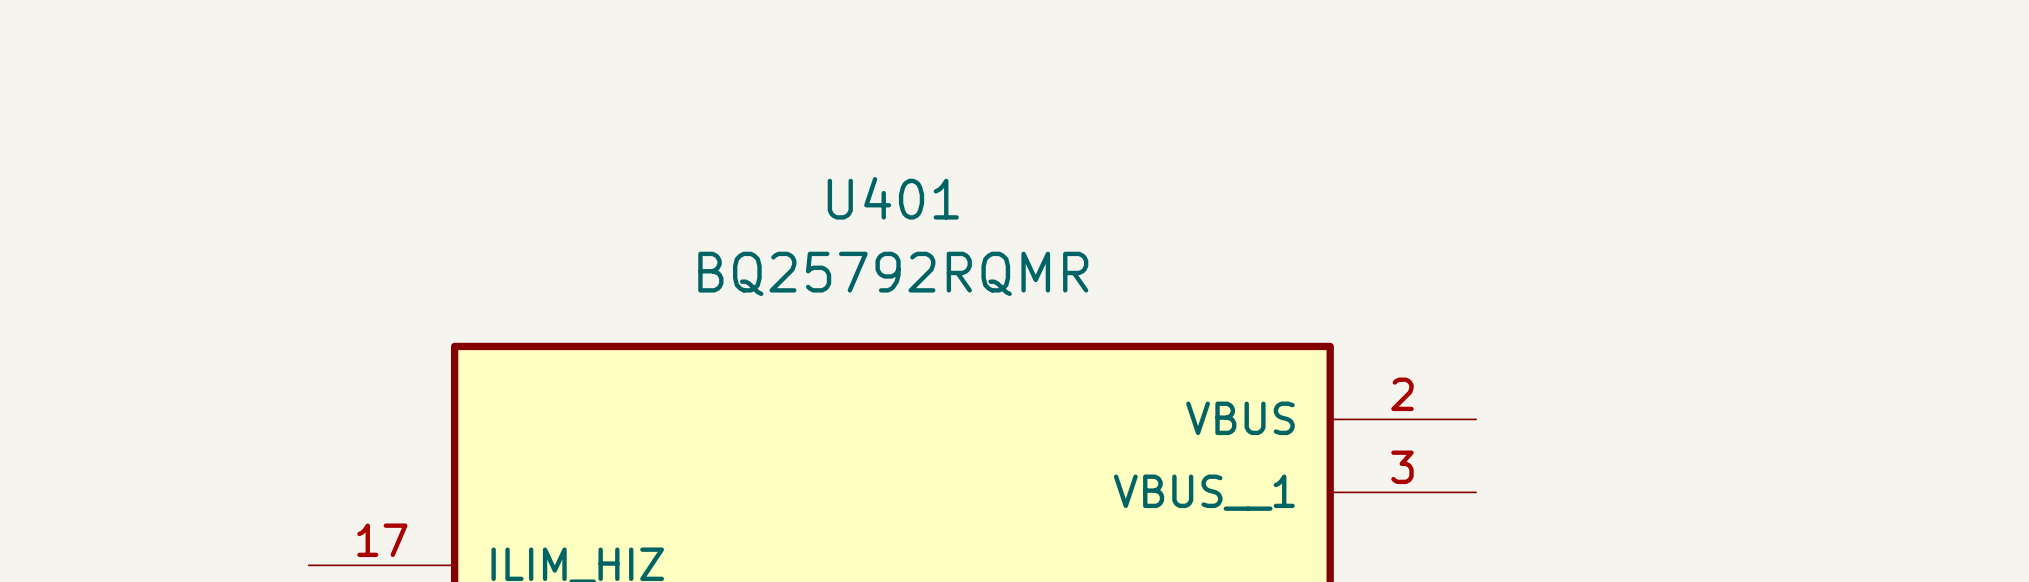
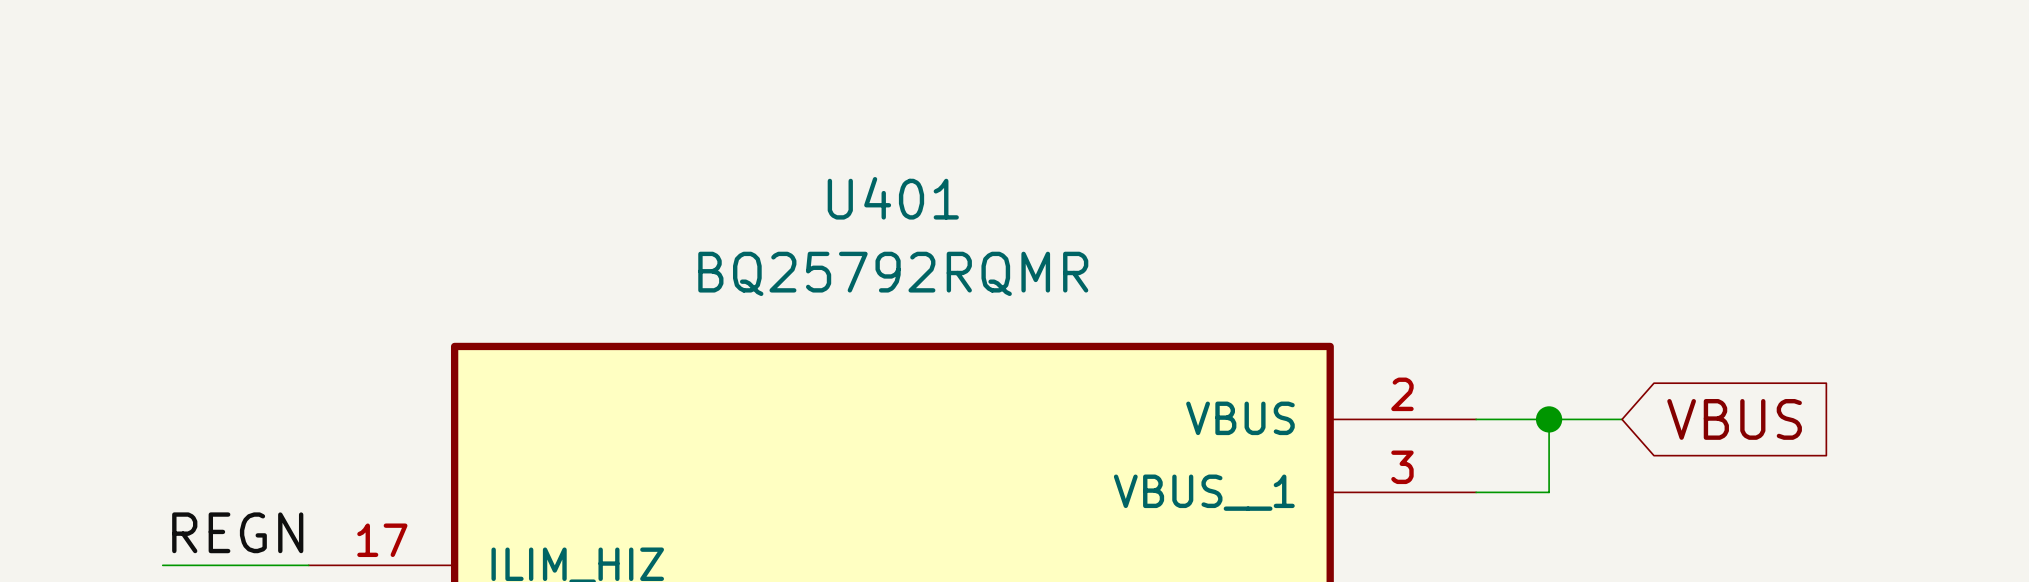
wire: none -> (1476, 419) (1622, 419)
wire: none -> (1549, 419) (1549, 492) (1476, 492)
junction: none -> (1549, 419)
global label: none -> VBUS (1734, 419)
label: none -> REGN (237, 532)
wire: none -> (162, 565) (308, 565)

